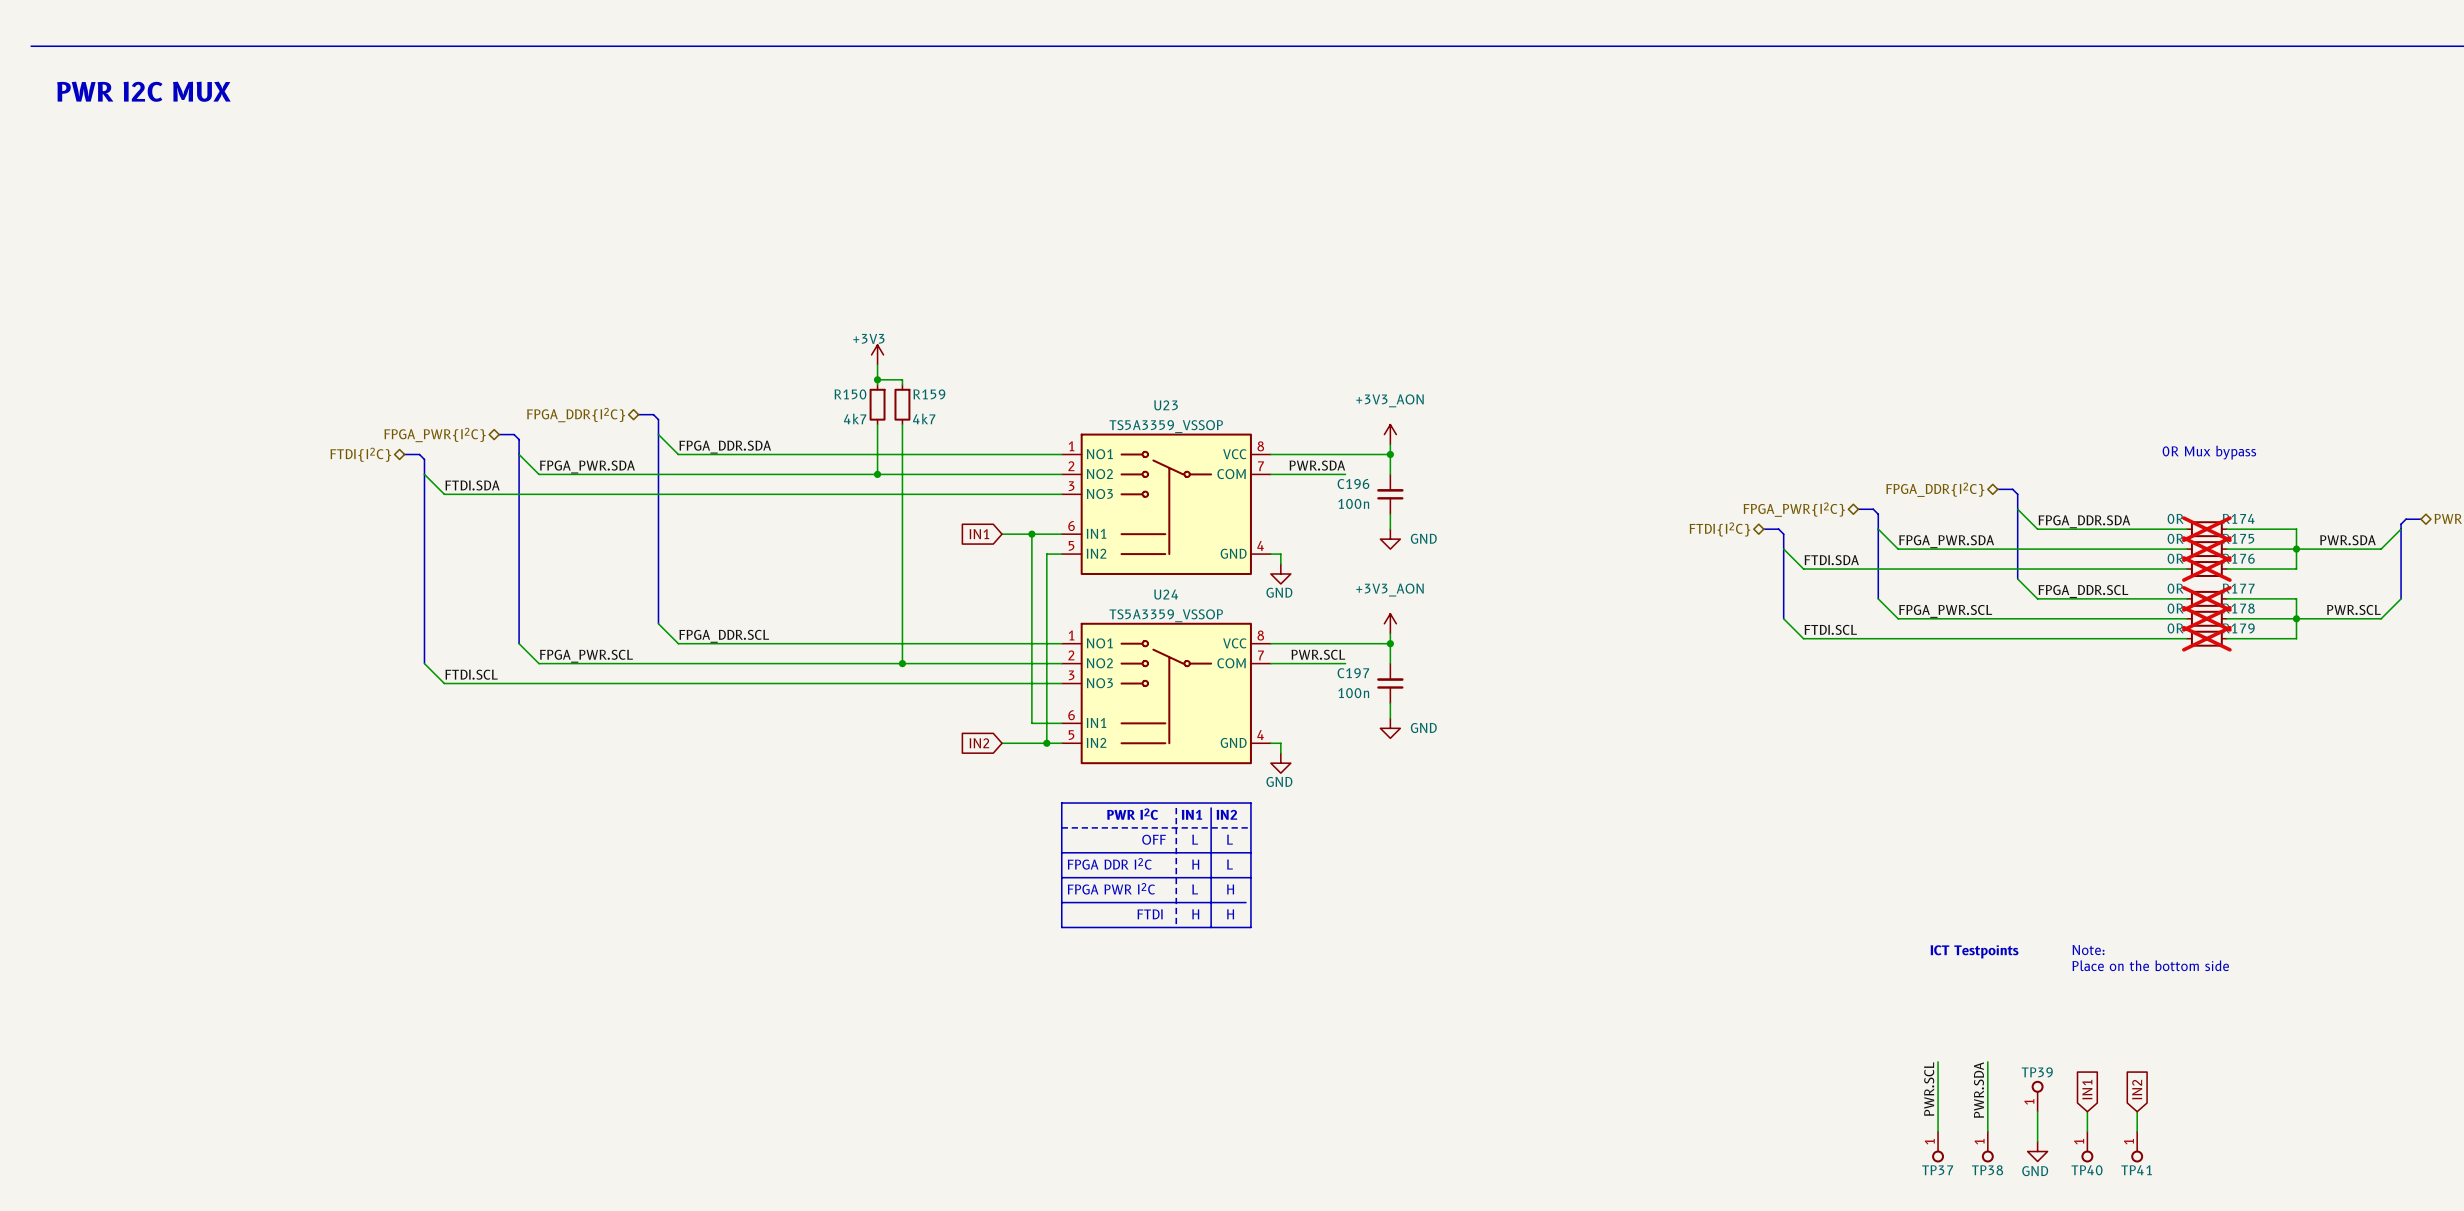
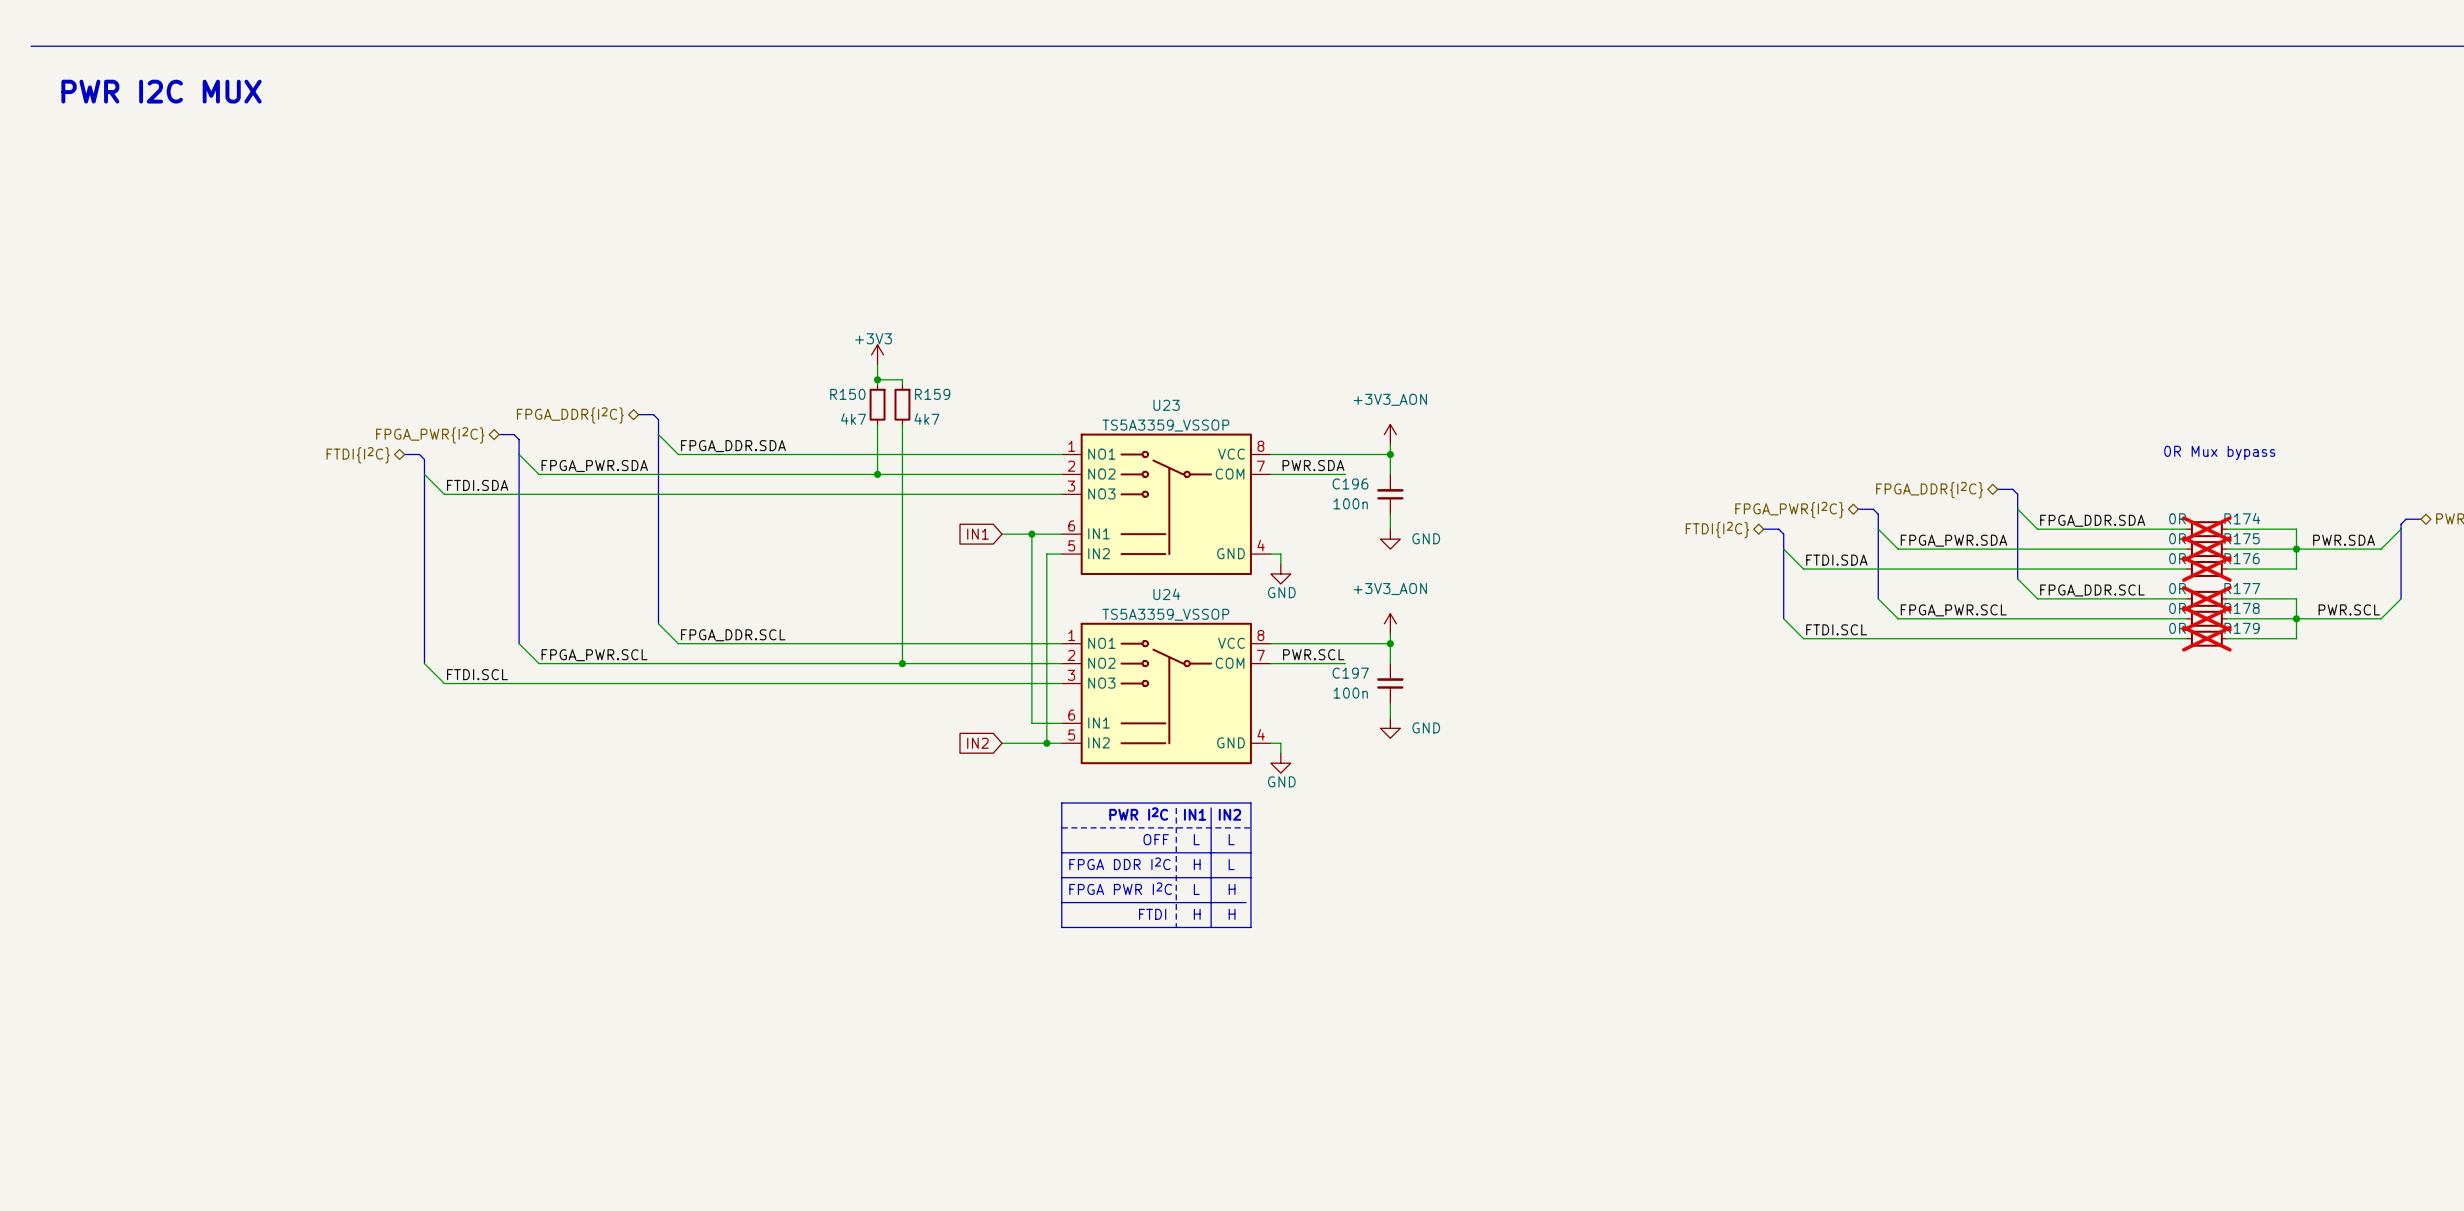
text: Note: (2088, 950) -> none
text: ICT Testpoints (1974, 951) -> none
text: Place on the bottom side (2150, 965) -> none
wire: (1938, 1061) (1938, 1131) -> none
wire: (1987, 1061) (1987, 1131) -> none
label: PWR.SCL (1929, 1089) -> none
global label: IN1 (2087, 1089) -> none
global label: IN2 (2137, 1089) -> none
label: PWR.SDA (1978, 1090) -> none
TP39: (2037, 1096) -> none
wire: (2037, 1111) (2037, 1141) -> none
wire: (2087, 1111) (2087, 1131) -> none
wire: (2137, 1111) (2137, 1131) -> none
TP37: (1938, 1147) -> none
TP38: (1987, 1147) -> none
TP40: (2087, 1147) -> none
TP41: (2137, 1147) -> none
power symbol: GND (2037, 1151) -> none

